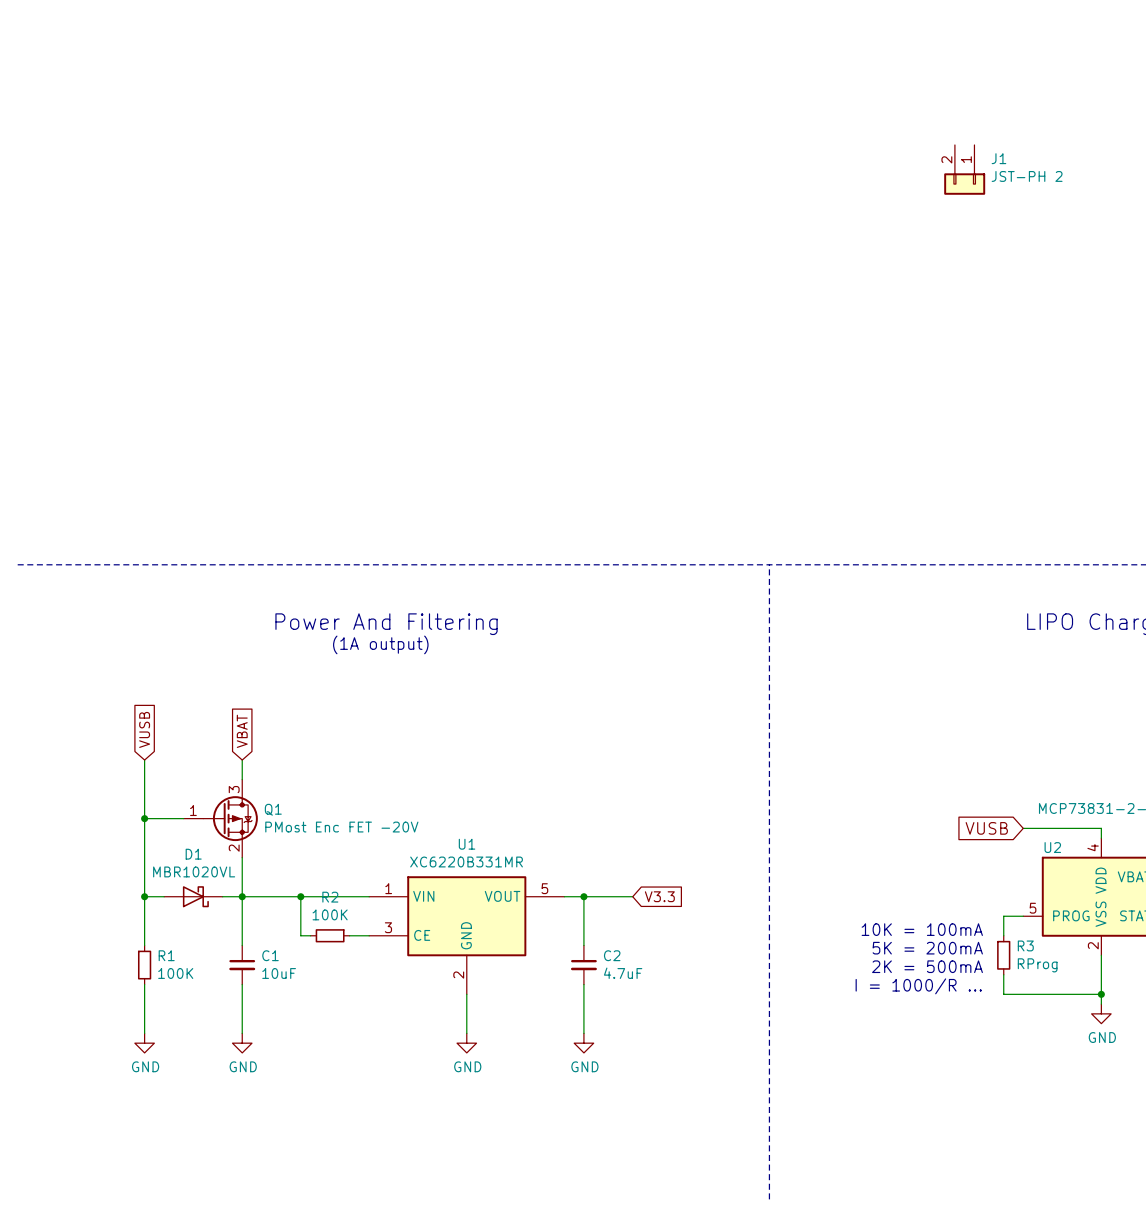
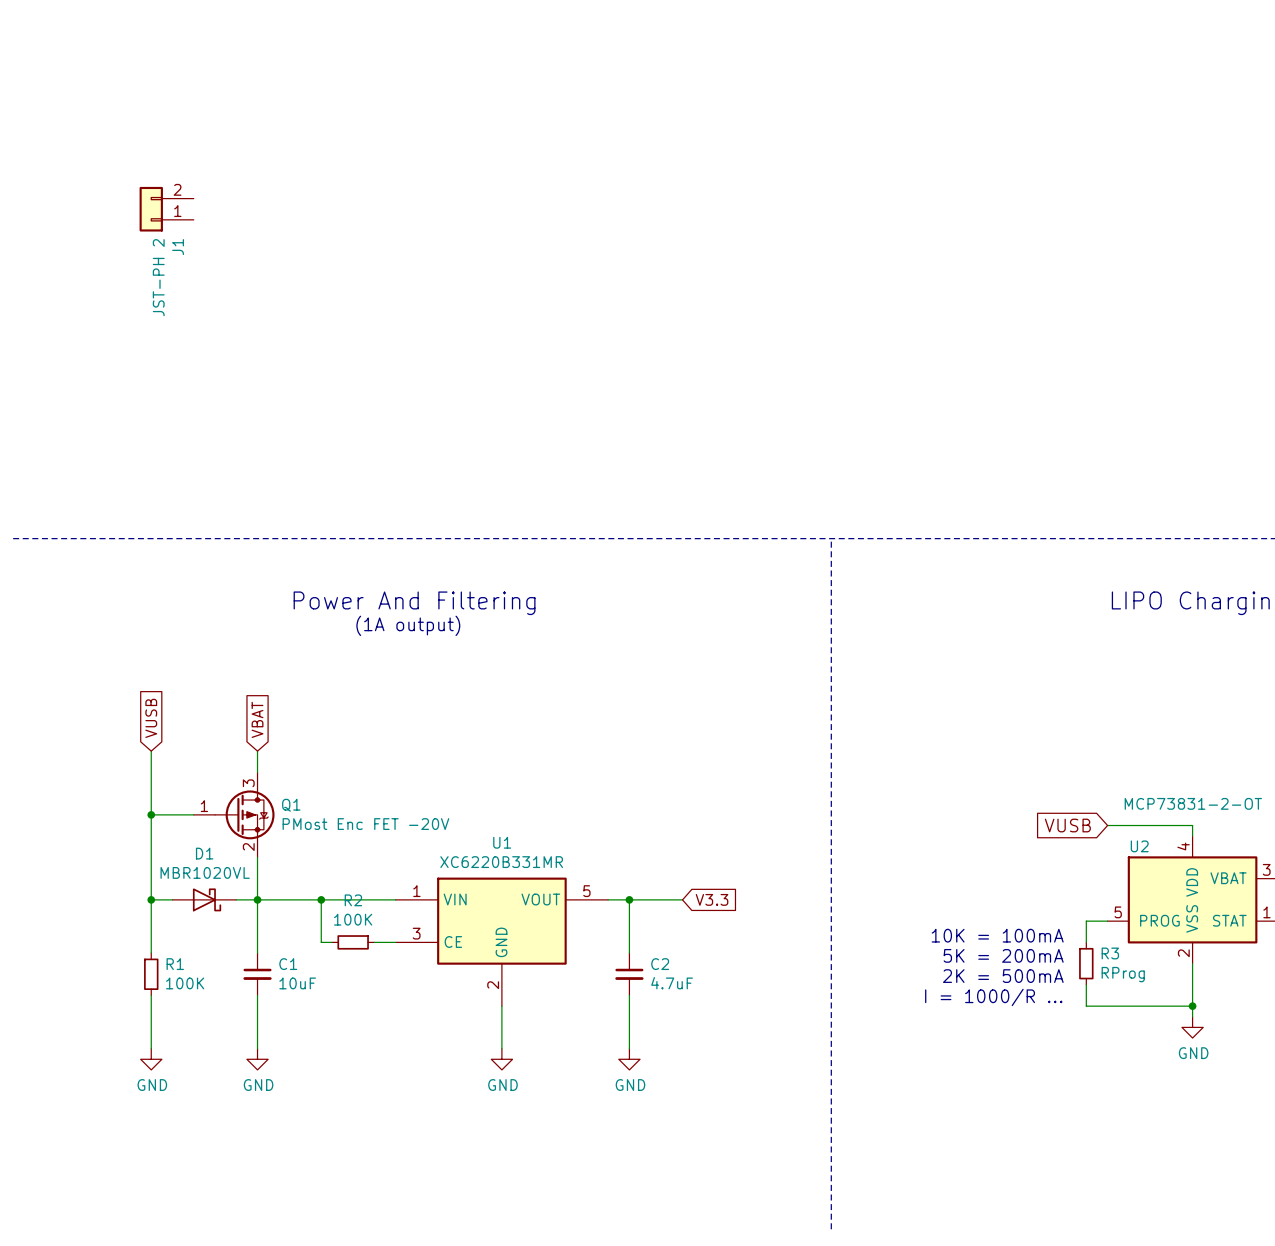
J1 position: (964, 169) -> (166, 209)
J1 rotation: 0° (964, 184) -> 90° clockwise (151, 209)

